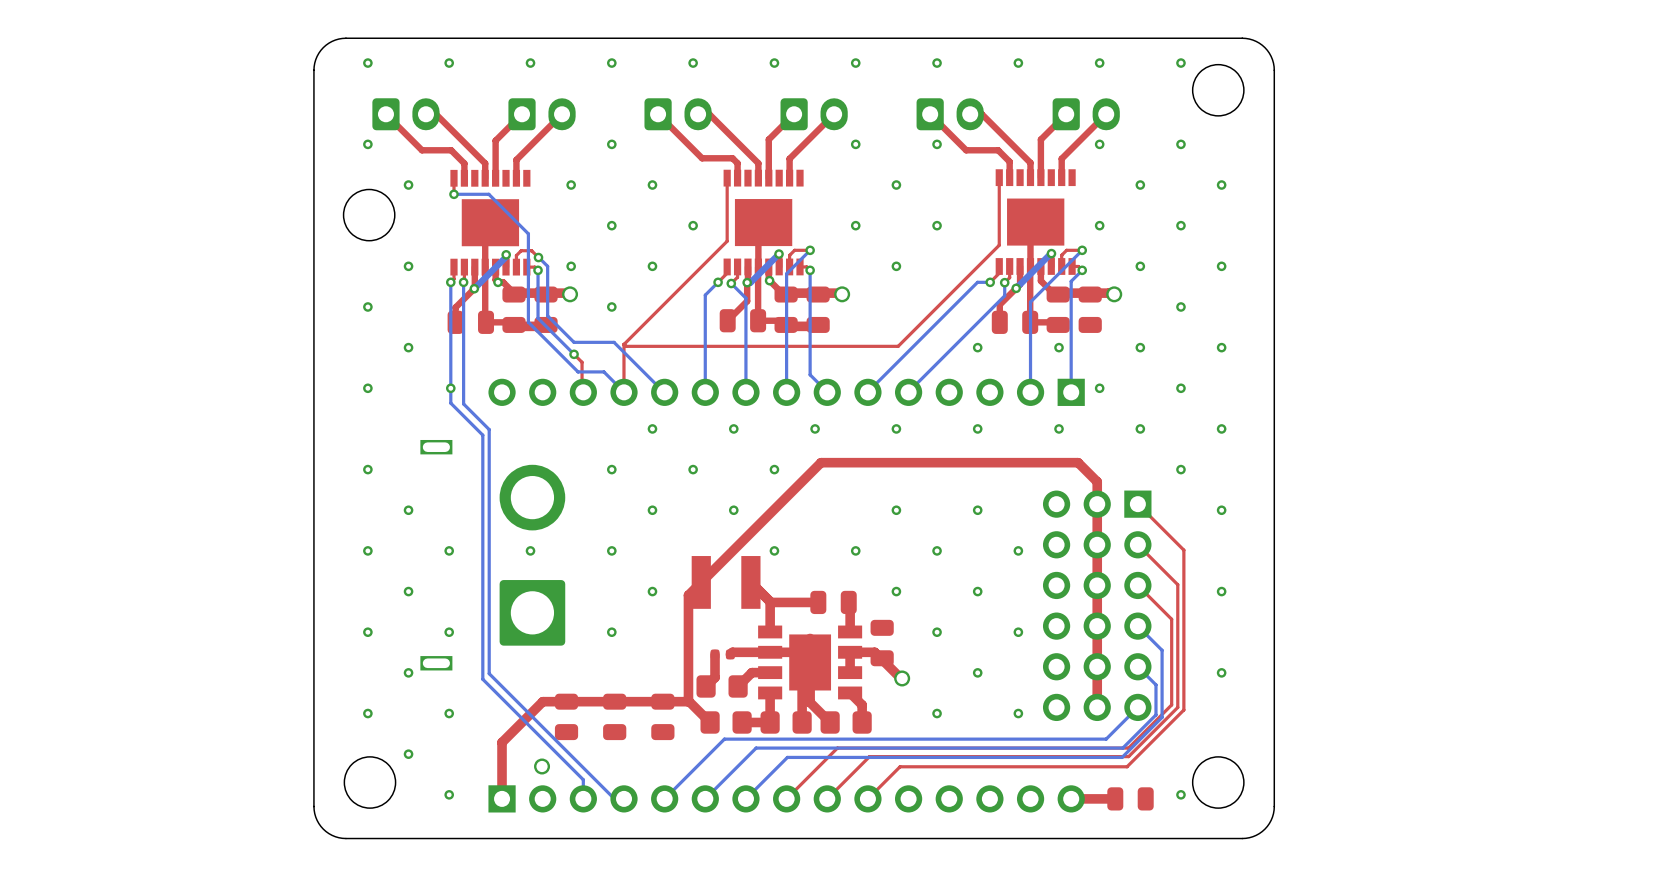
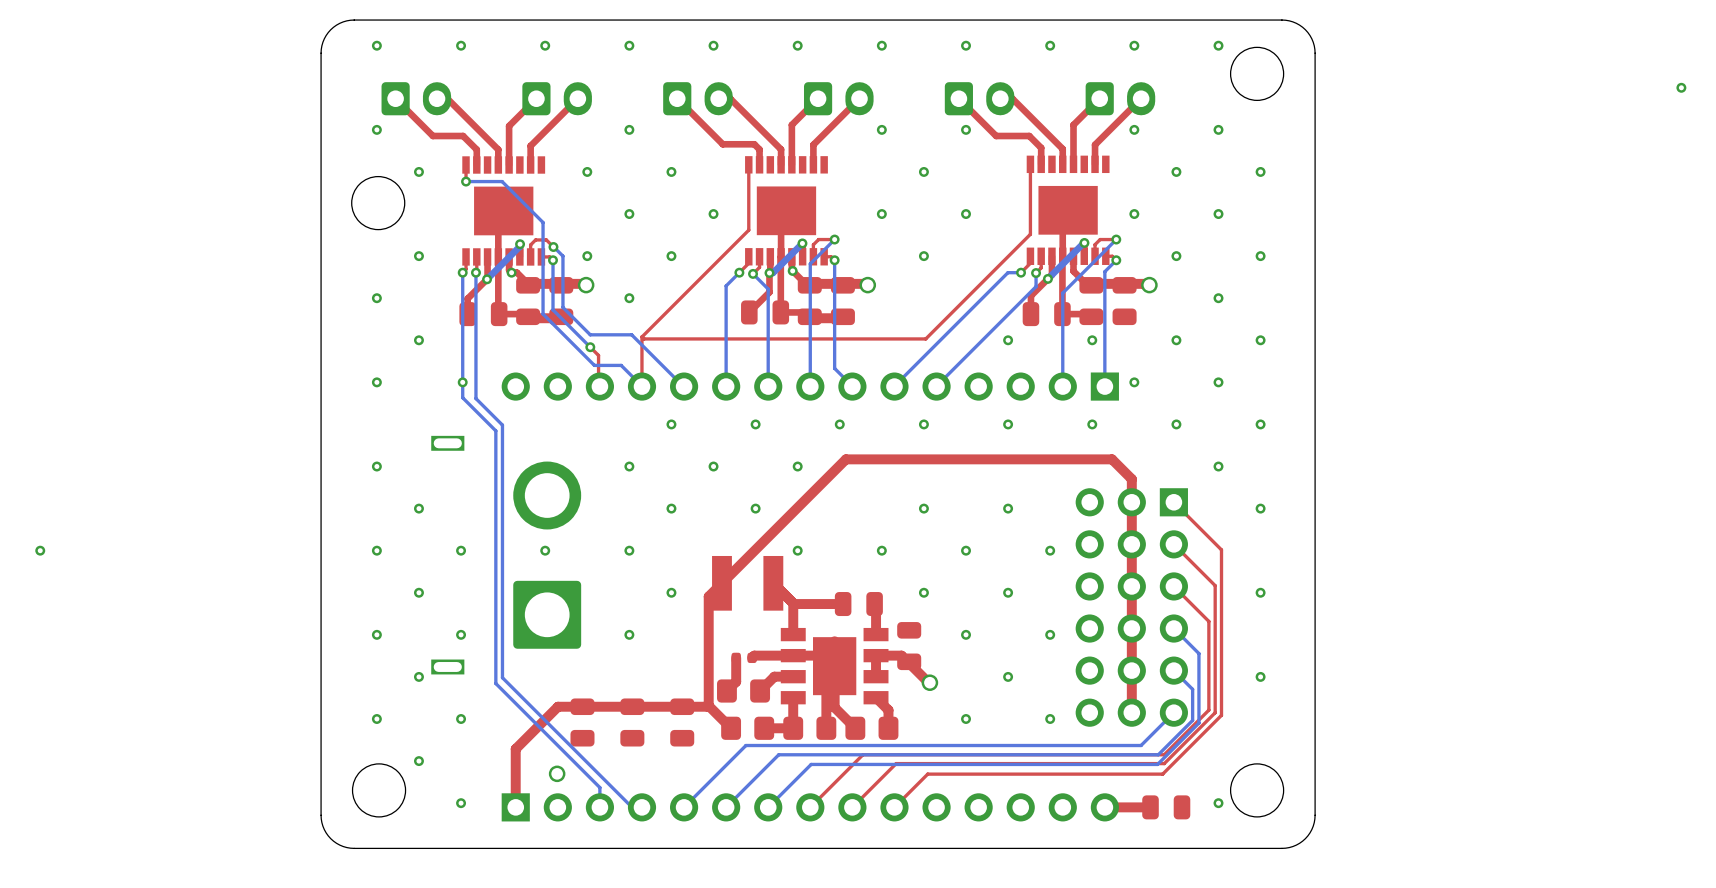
via: none -> (1681, 87)
via: none -> (40, 550)

